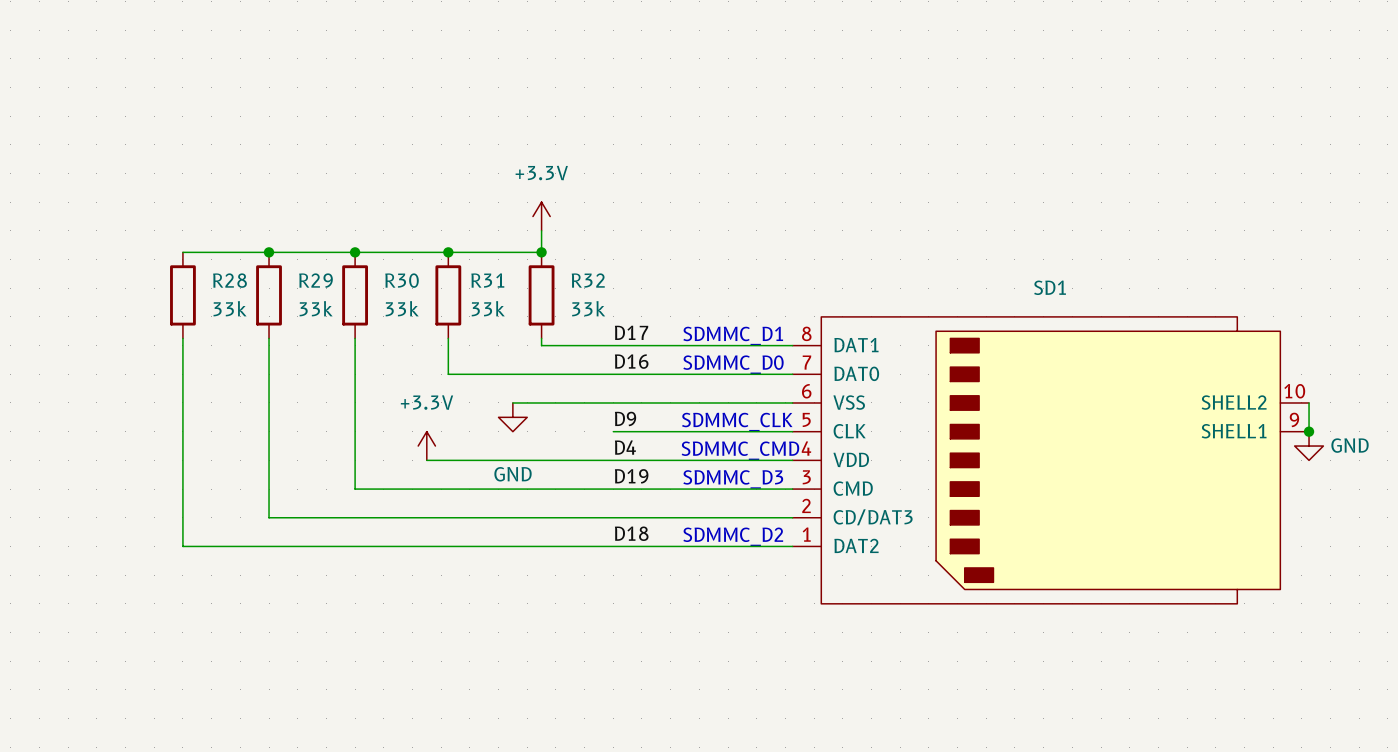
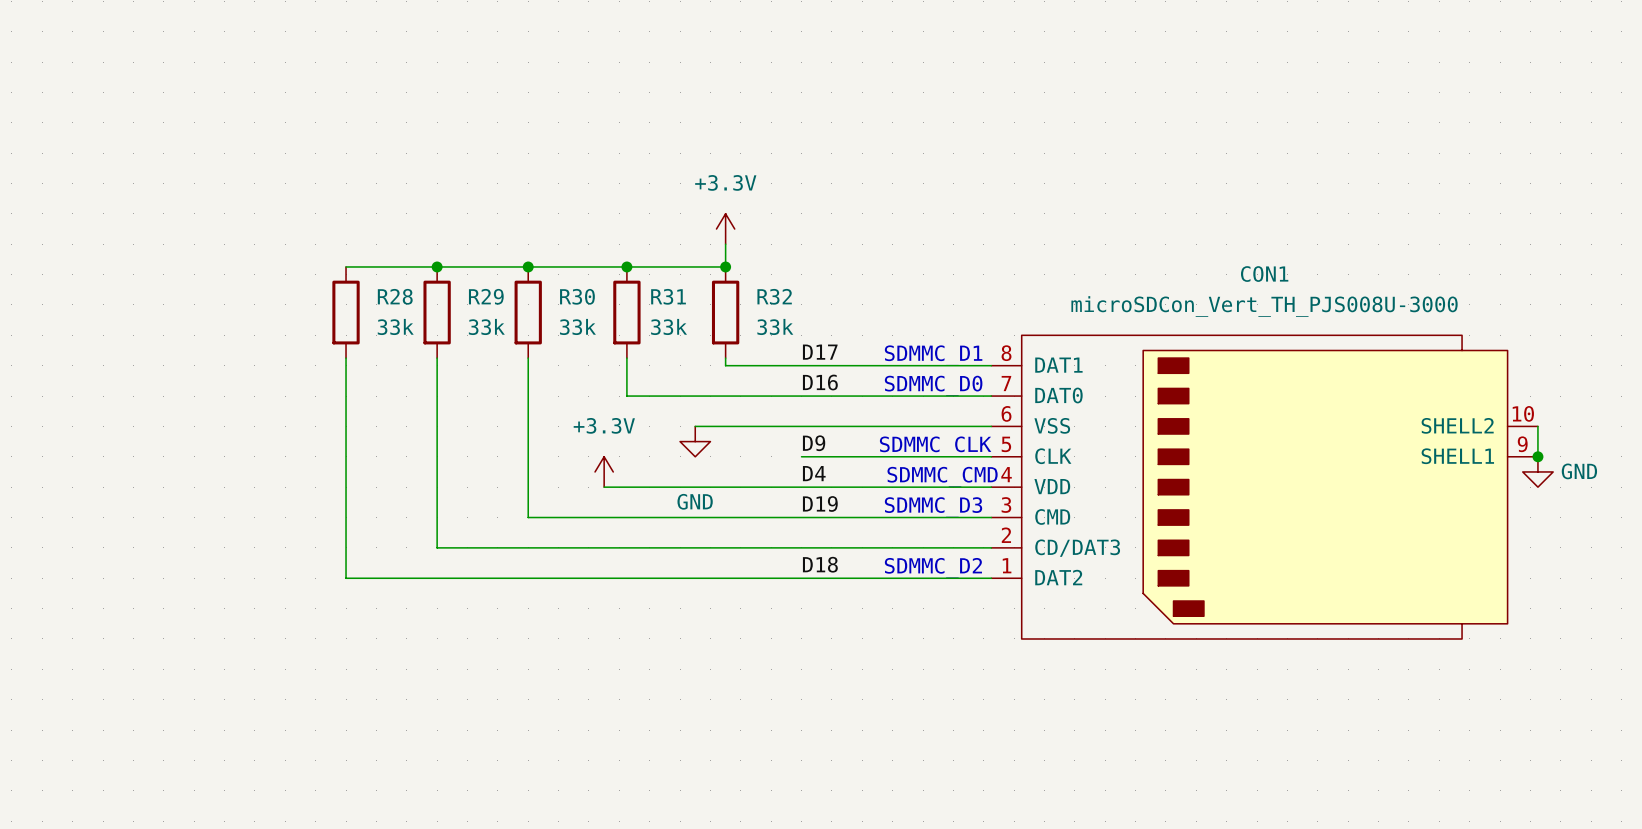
SD1 name: SD1 (1050, 287) -> CON1 (1264, 274)
SD1 value: none -> microSDCon_Vert_TH_PJS008U-3000 (1264, 306)

